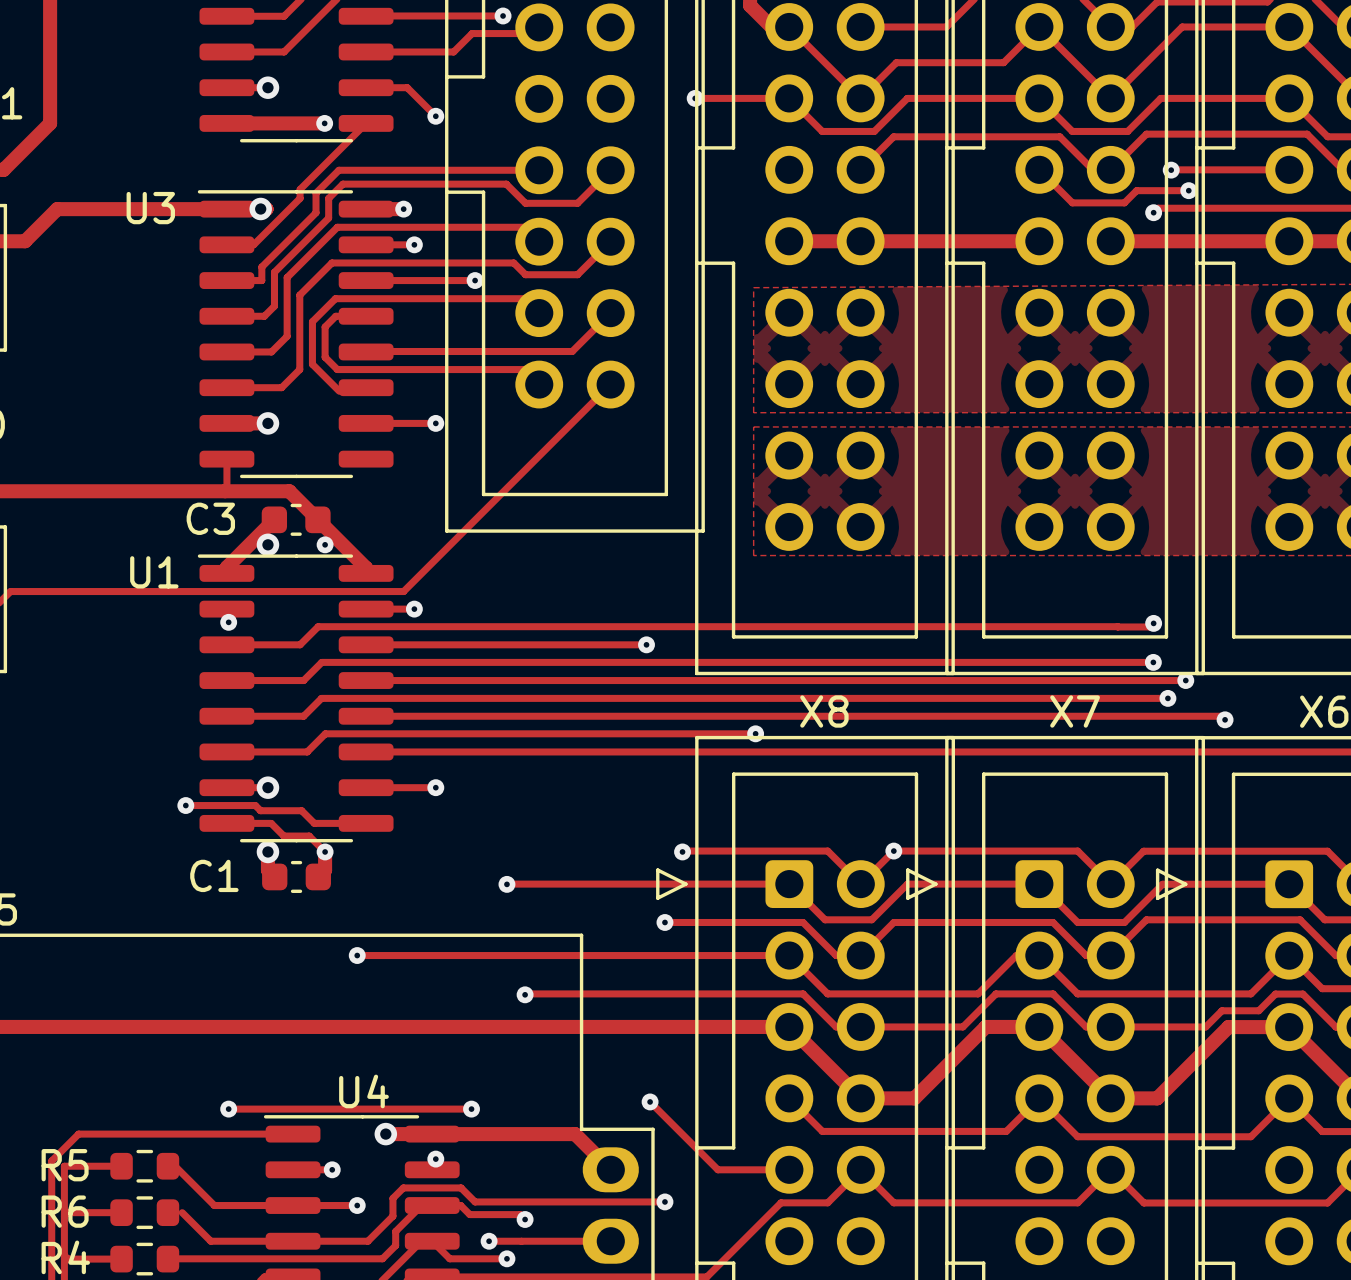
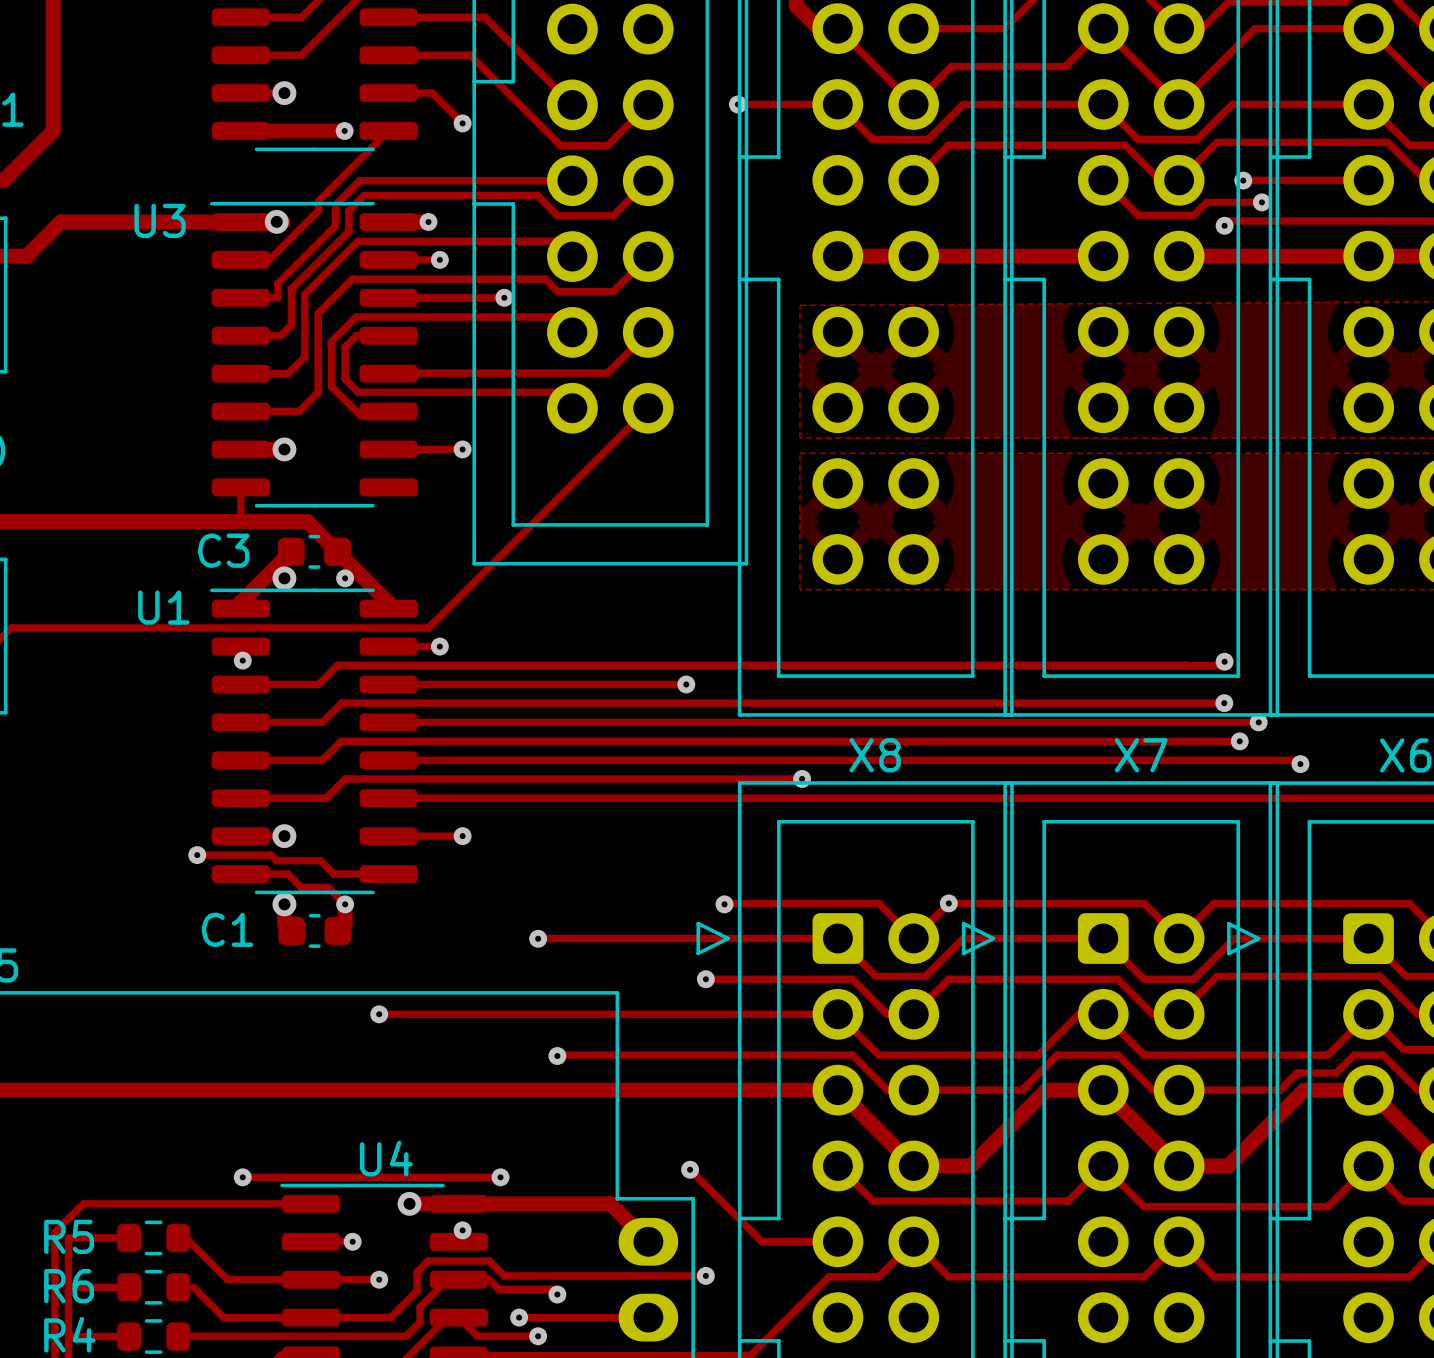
track: (366, 15) (503, 15) -> (388, 17) (484, 17) (572, 104)
via: (503, 15) -> none
track: (539, 27) (533, 33) (472, 33) (453, 51) (442, 51) -> (648, 104) (607, 145) (560, 145) (470, 55)

